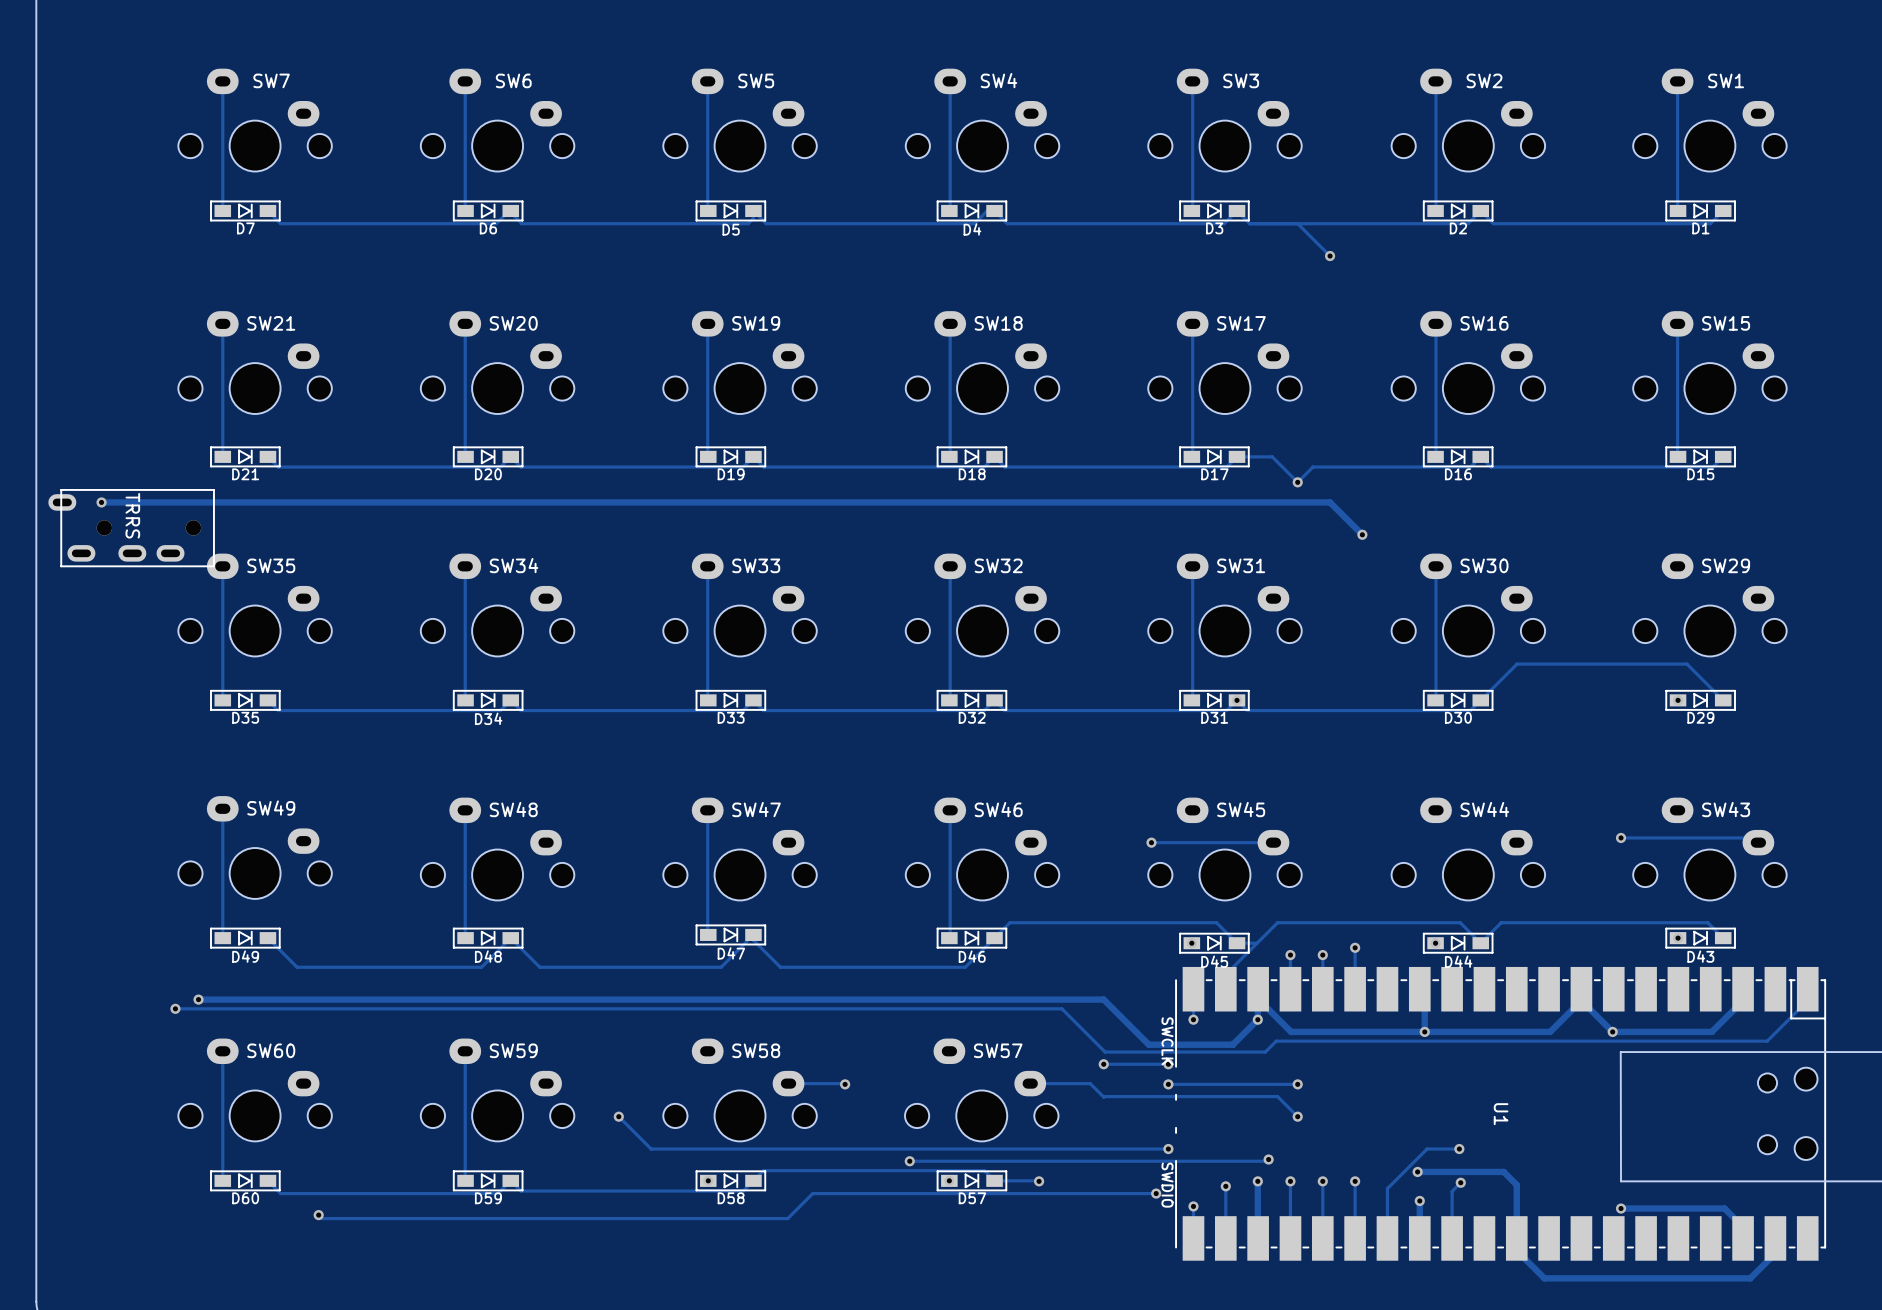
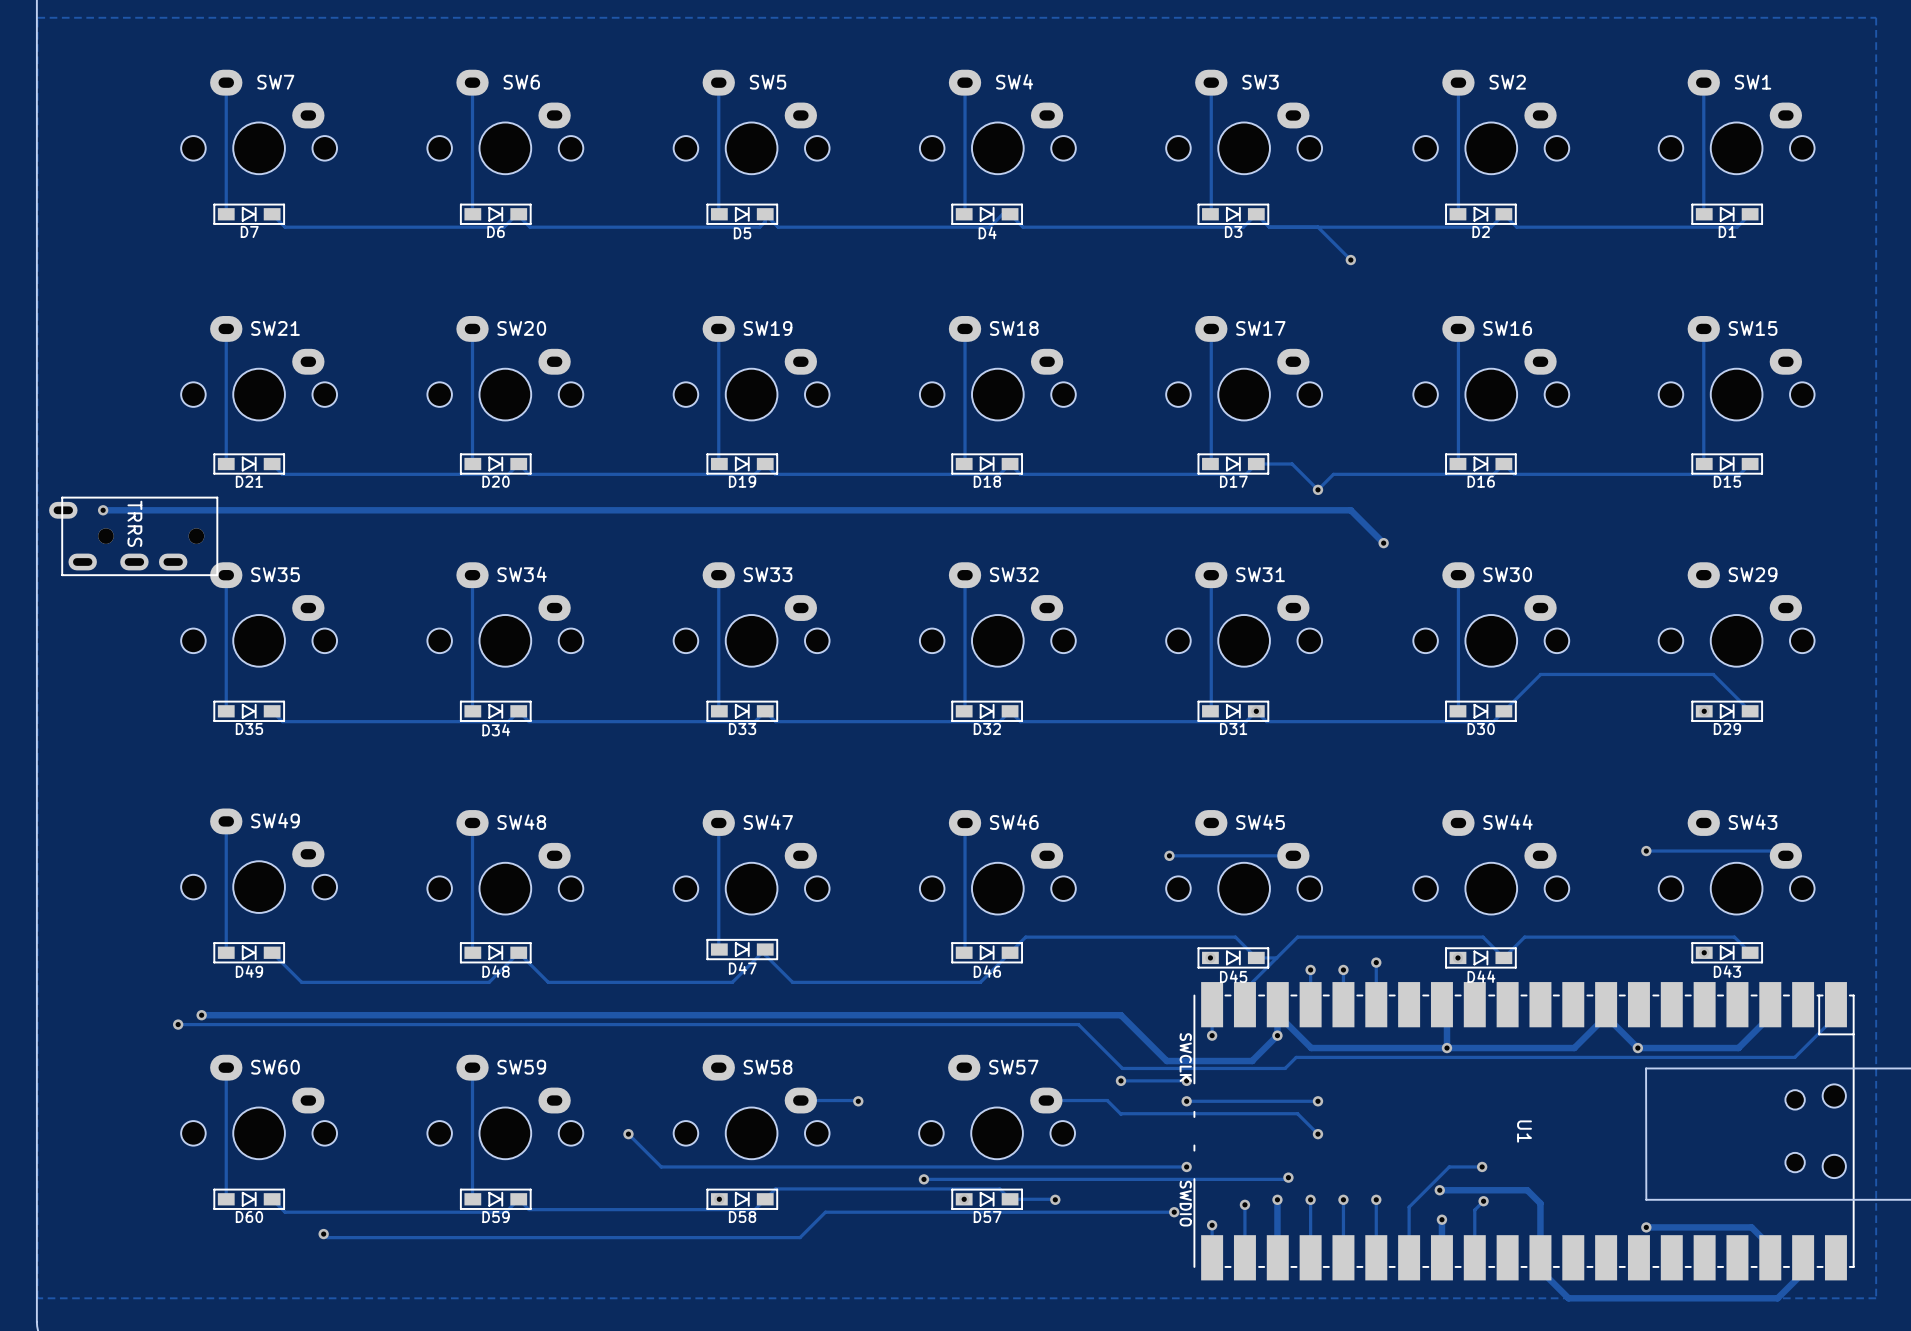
zone outline: none -> (1876, 17) (1876, 1298) (37, 1298) (37, 17) (1876, 17)

